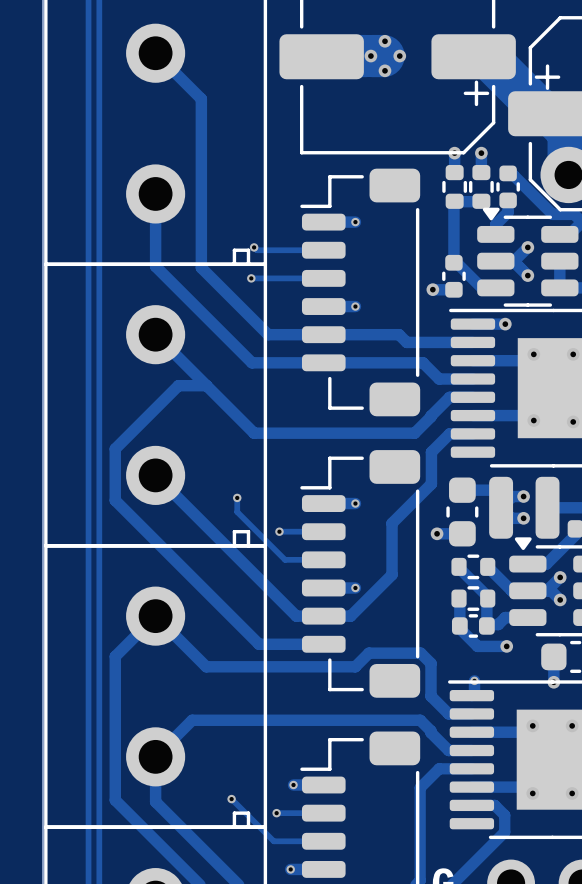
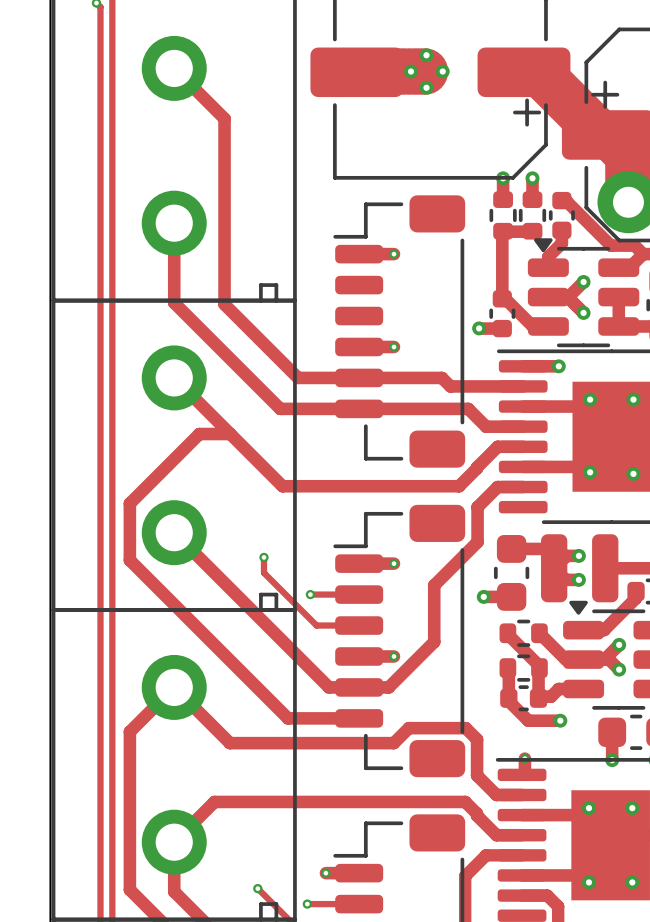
track: (254, 247) (256, 250) (323, 250) -> none
via: (254, 247) -> none
track: (251, 278) (323, 278) -> none
via: (251, 278) -> none

